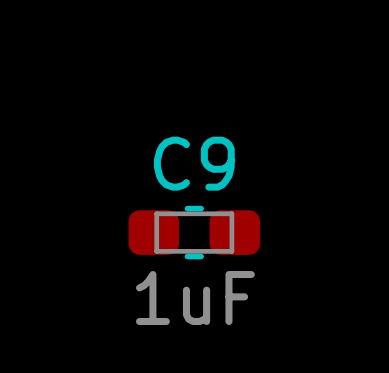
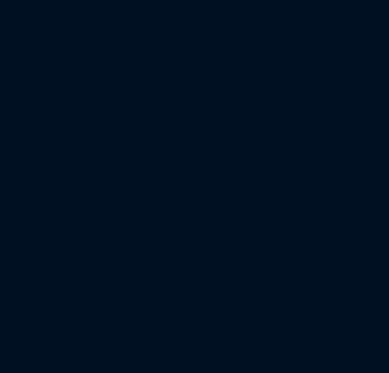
C9: 1uF (194, 232) -> none

